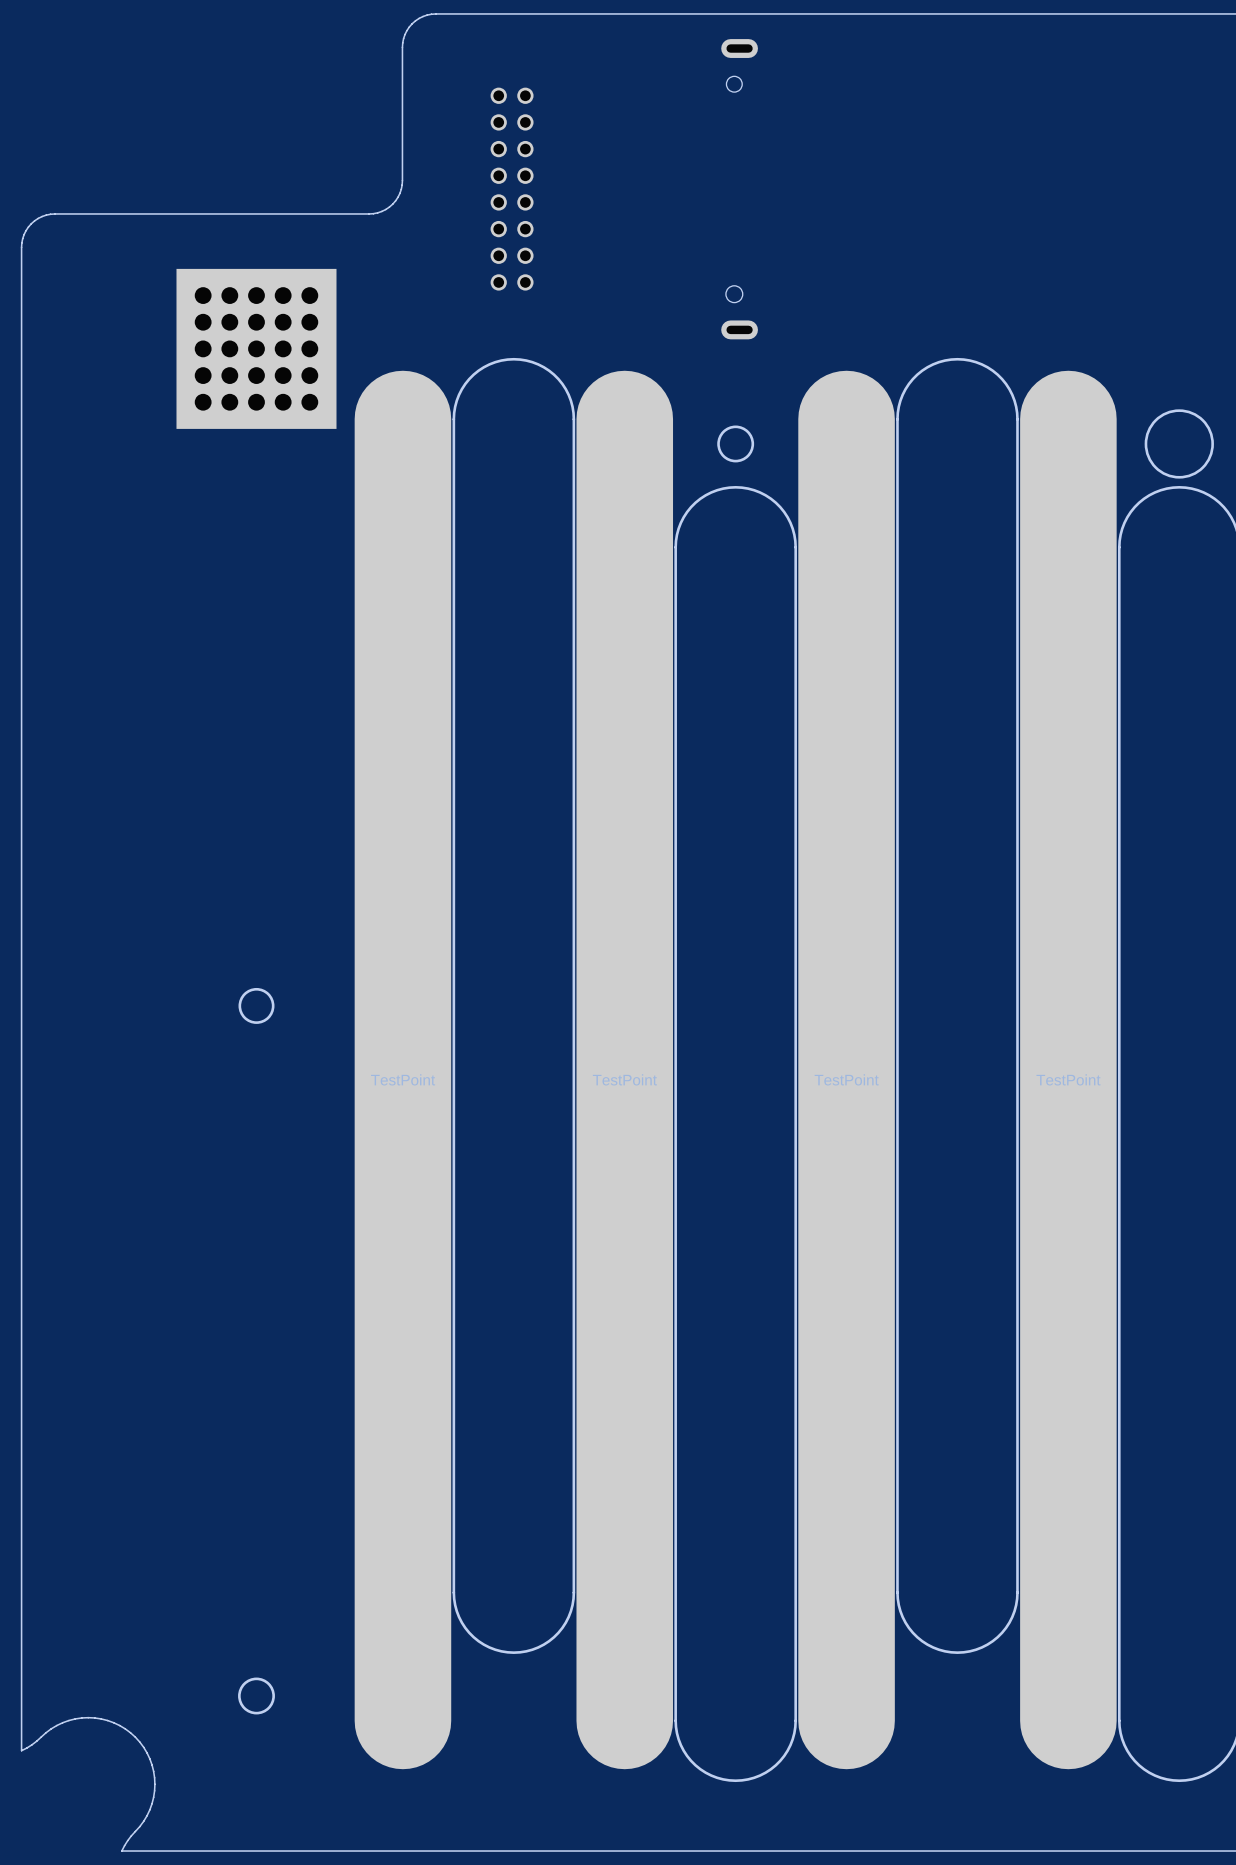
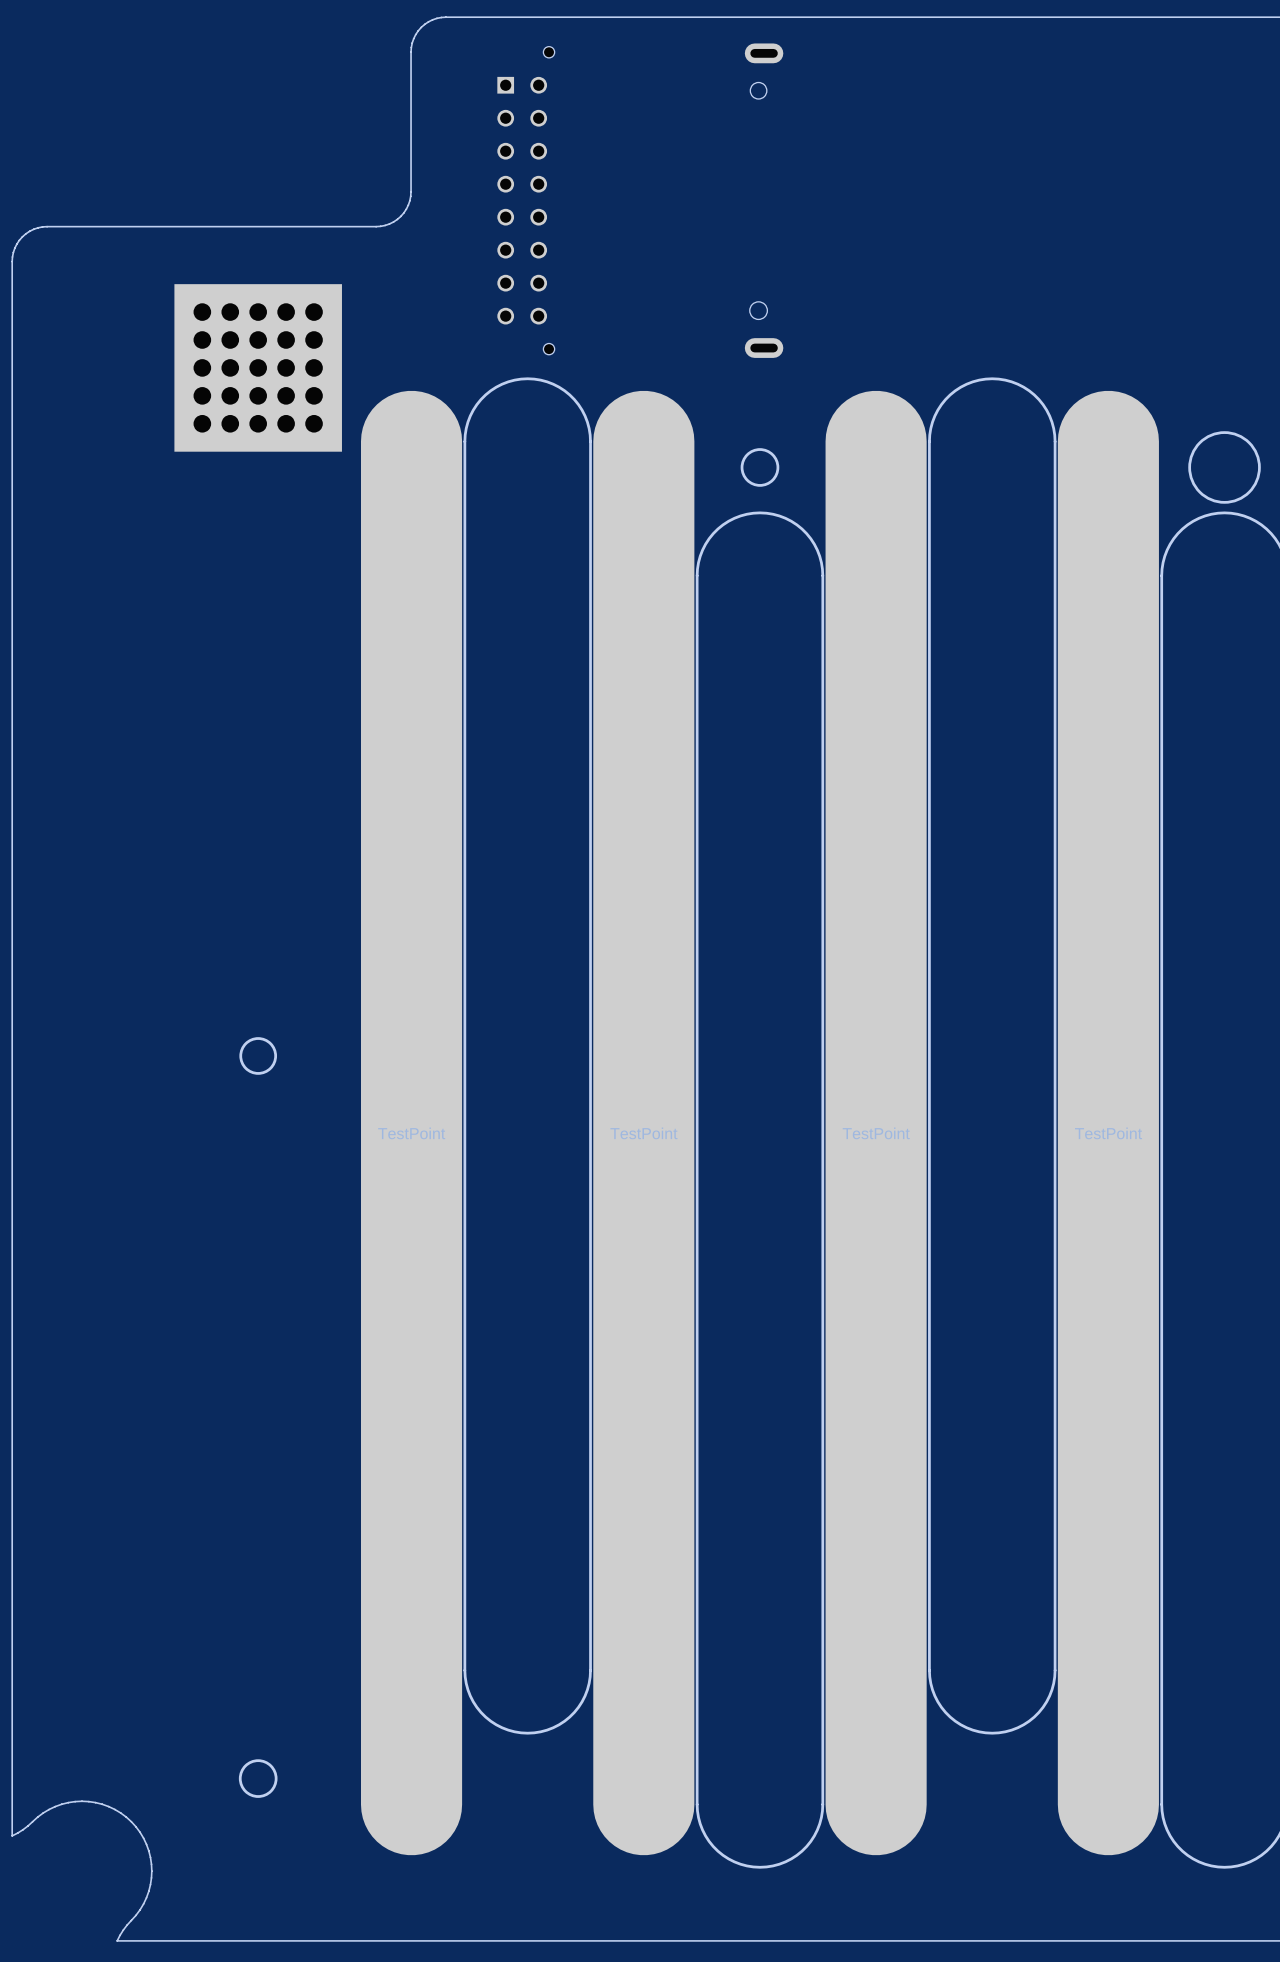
part footprint: [490, 87, 534, 291] -> [497, 46, 555, 355]

